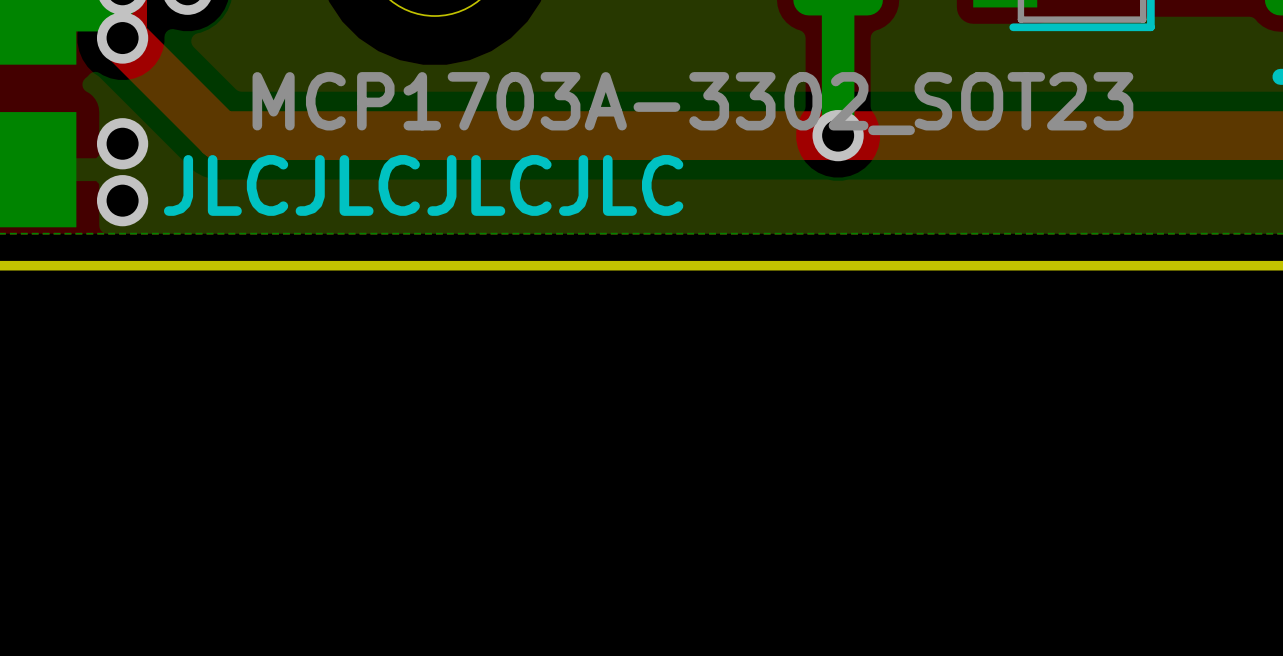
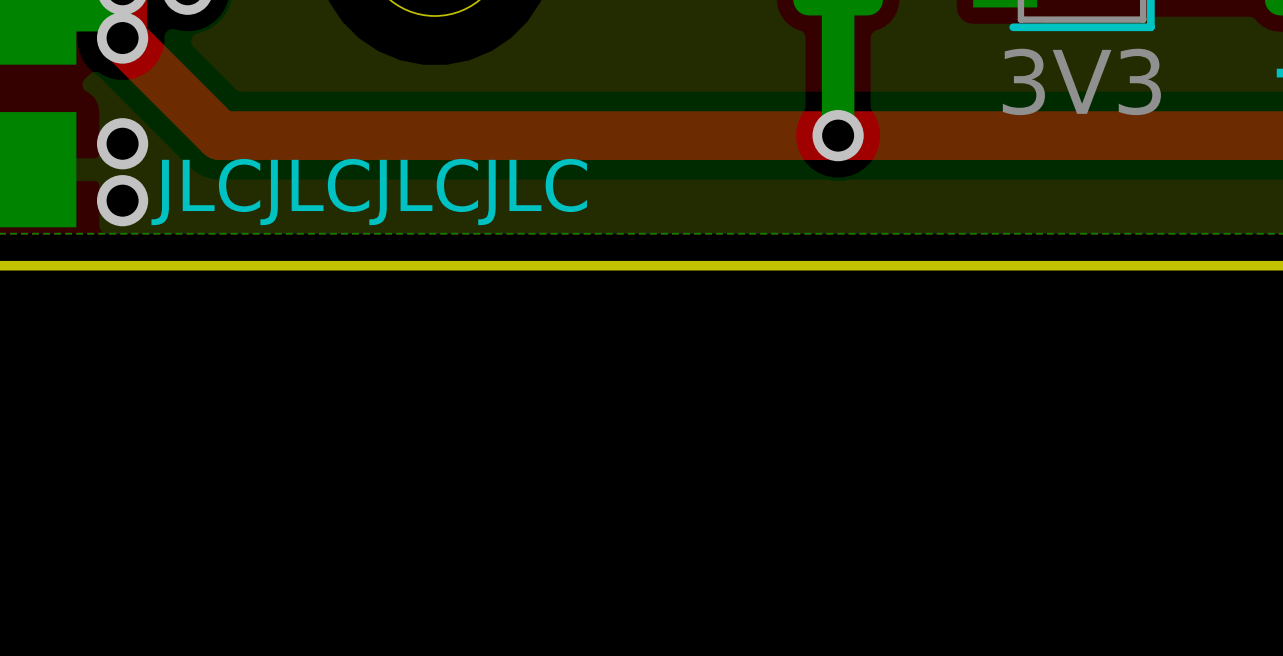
part value: MCP1703A-3302_SOT23 (692, 103) -> 3V3 (1081, 81)

